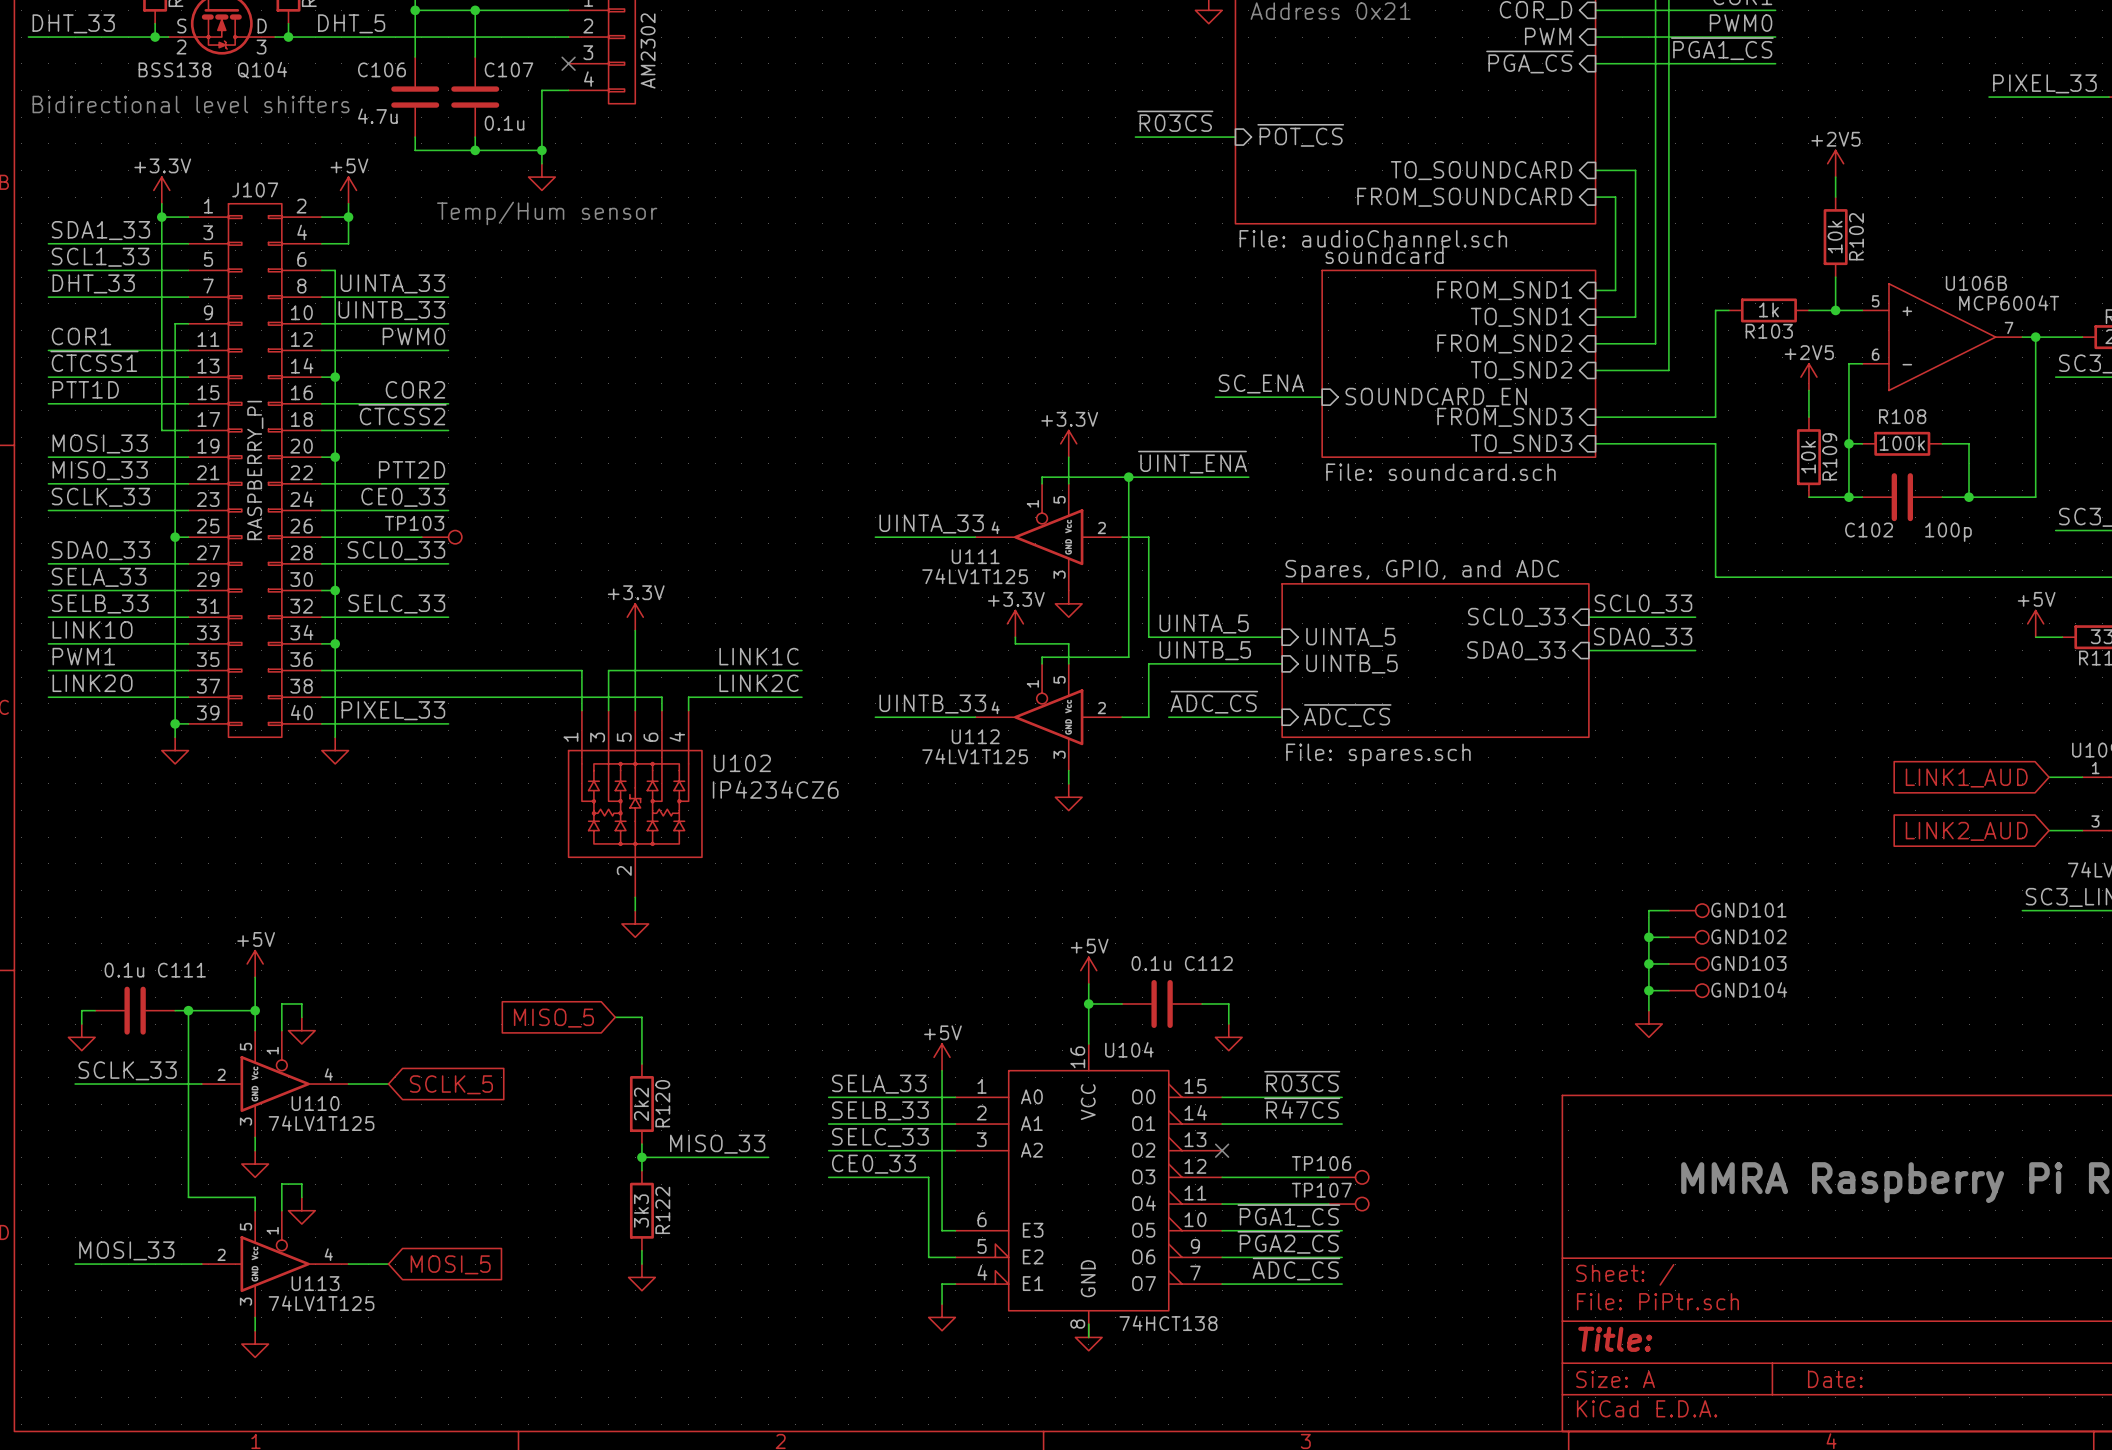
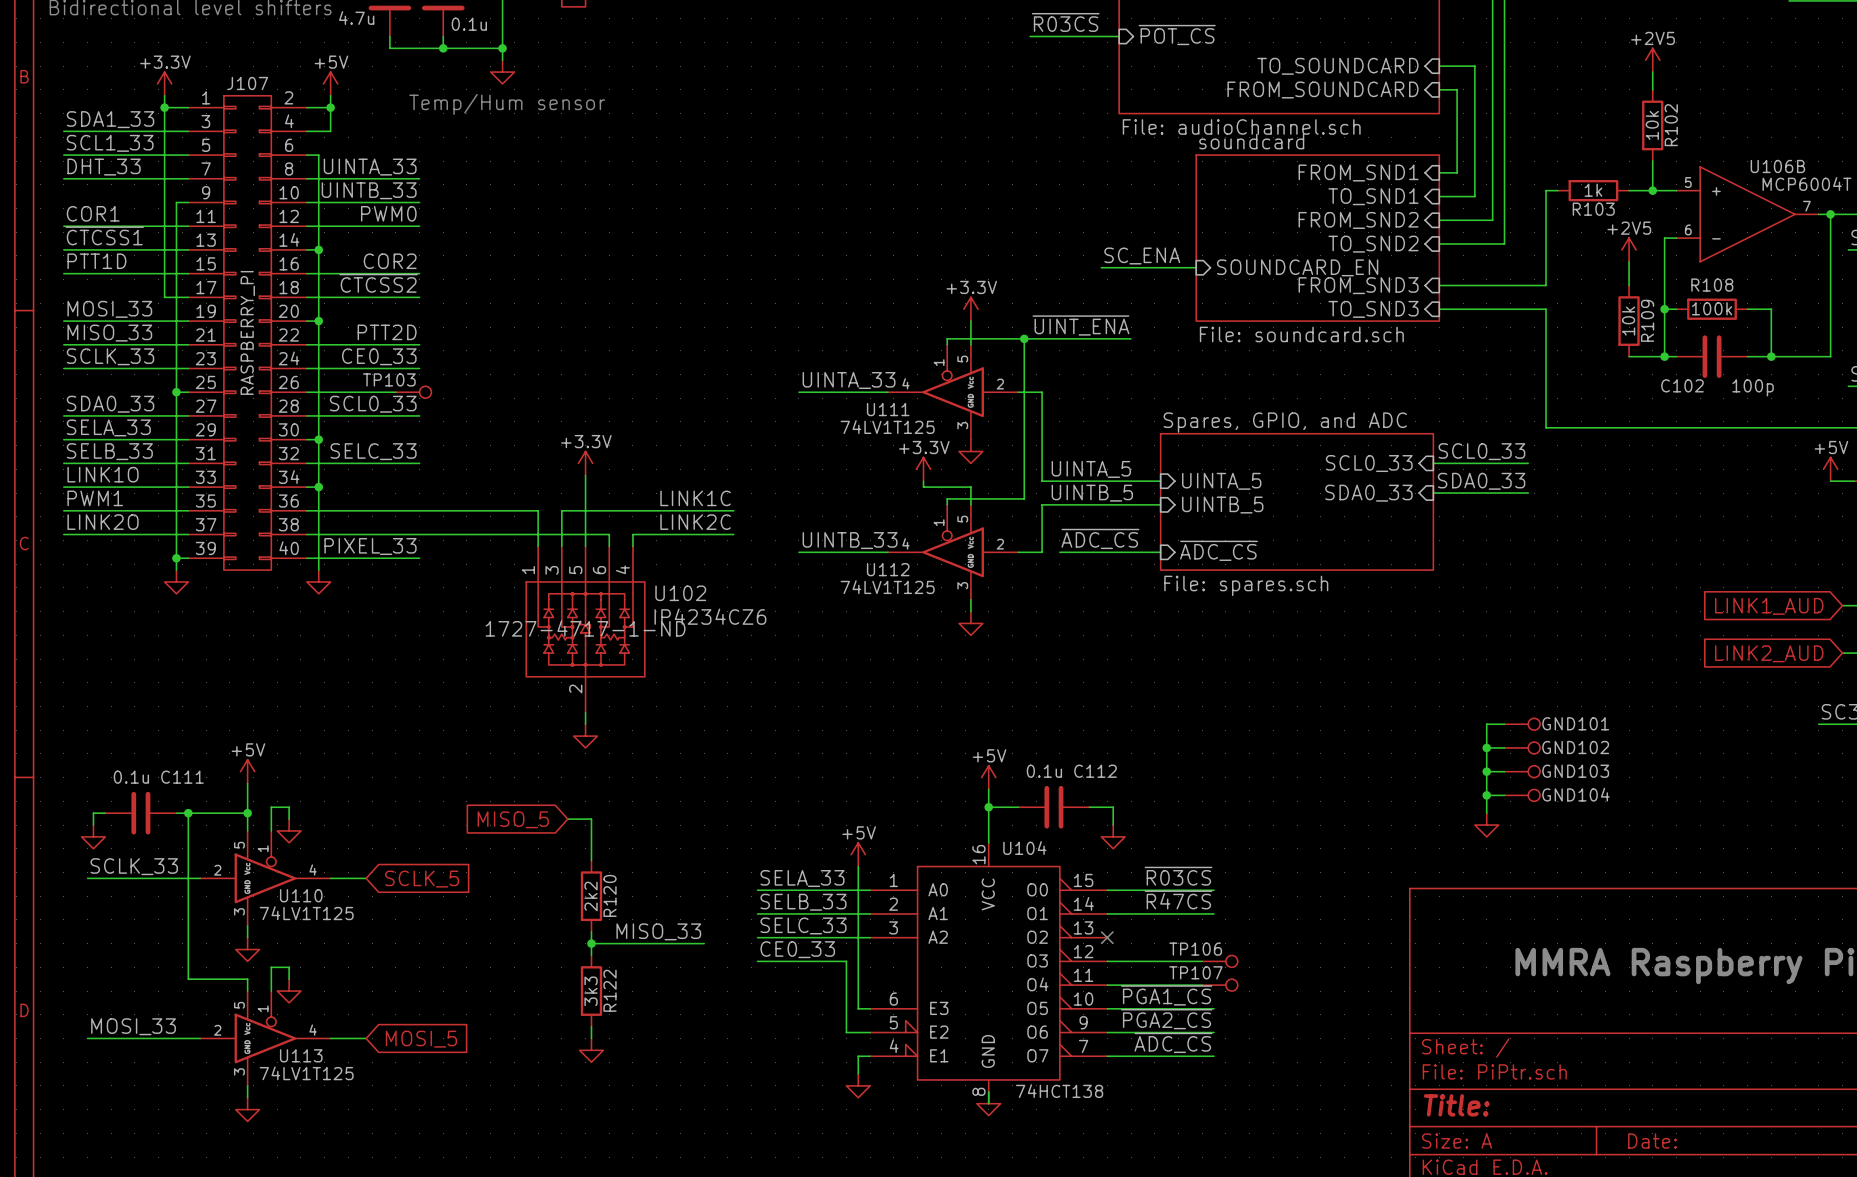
U102 text: none -> 1727-4717-1-ND (585, 628)

